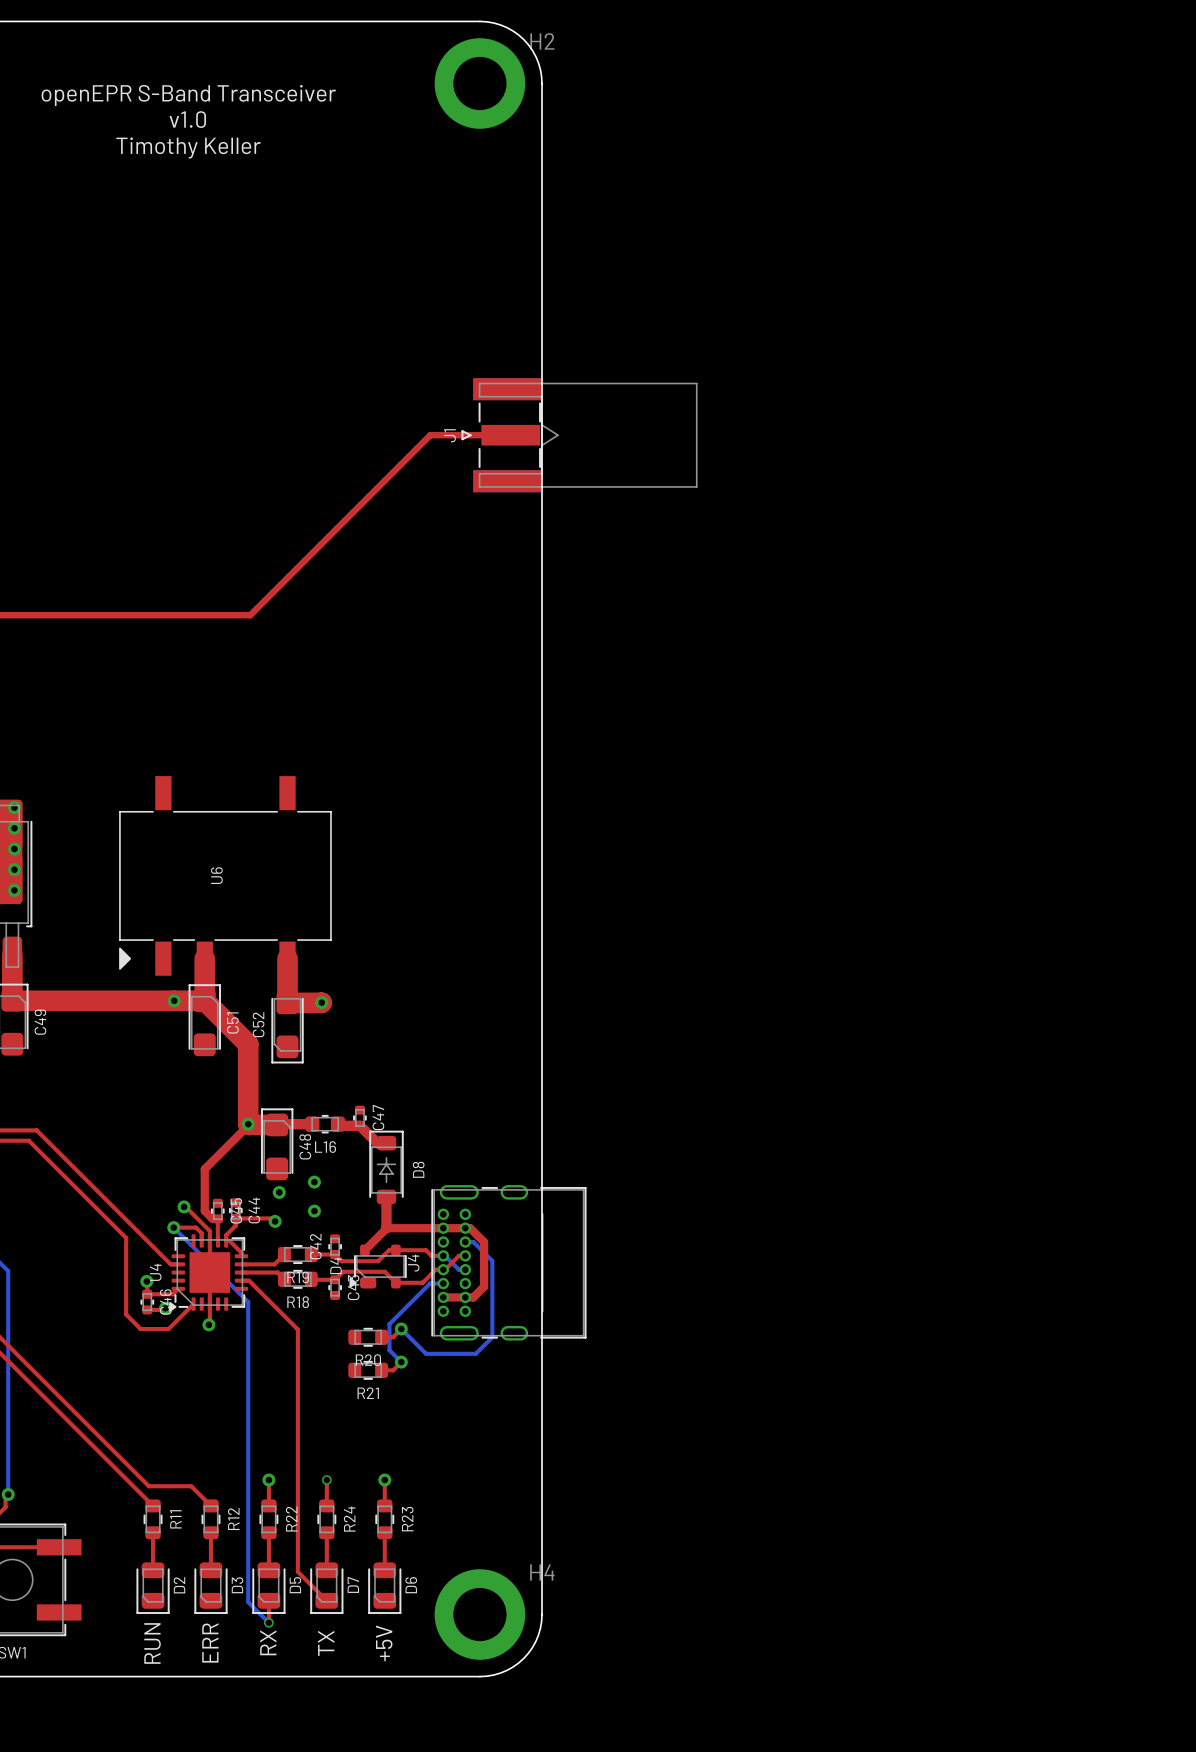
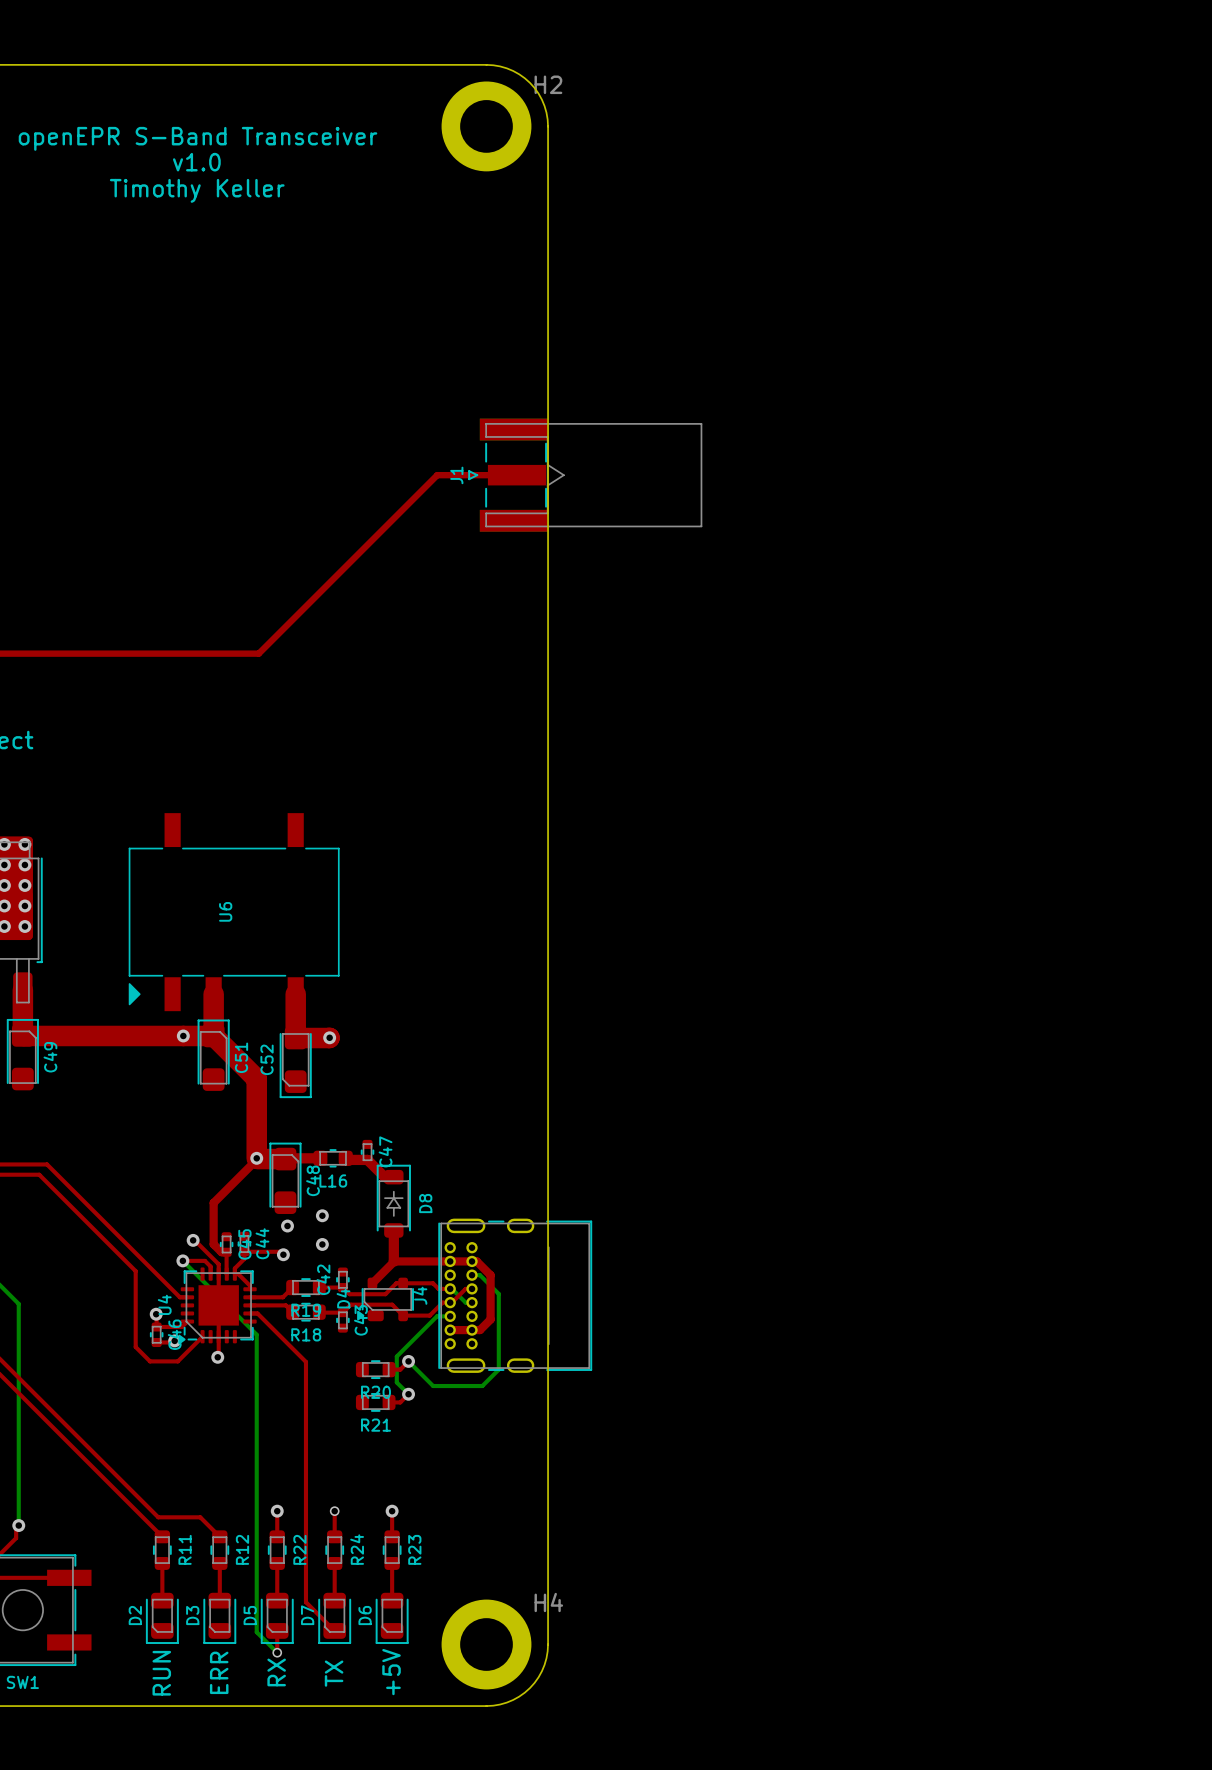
D7 name position: D7 (353, 1584) -> D7 (307, 1615)
D2 name position: D2 (179, 1585) -> D2 (135, 1615)
D3 name position: D3 (237, 1585) -> D3 (192, 1615)
D5 name position: D5 (295, 1585) -> D5 (250, 1615)
D6 name position: D6 (411, 1585) -> D6 (365, 1615)

